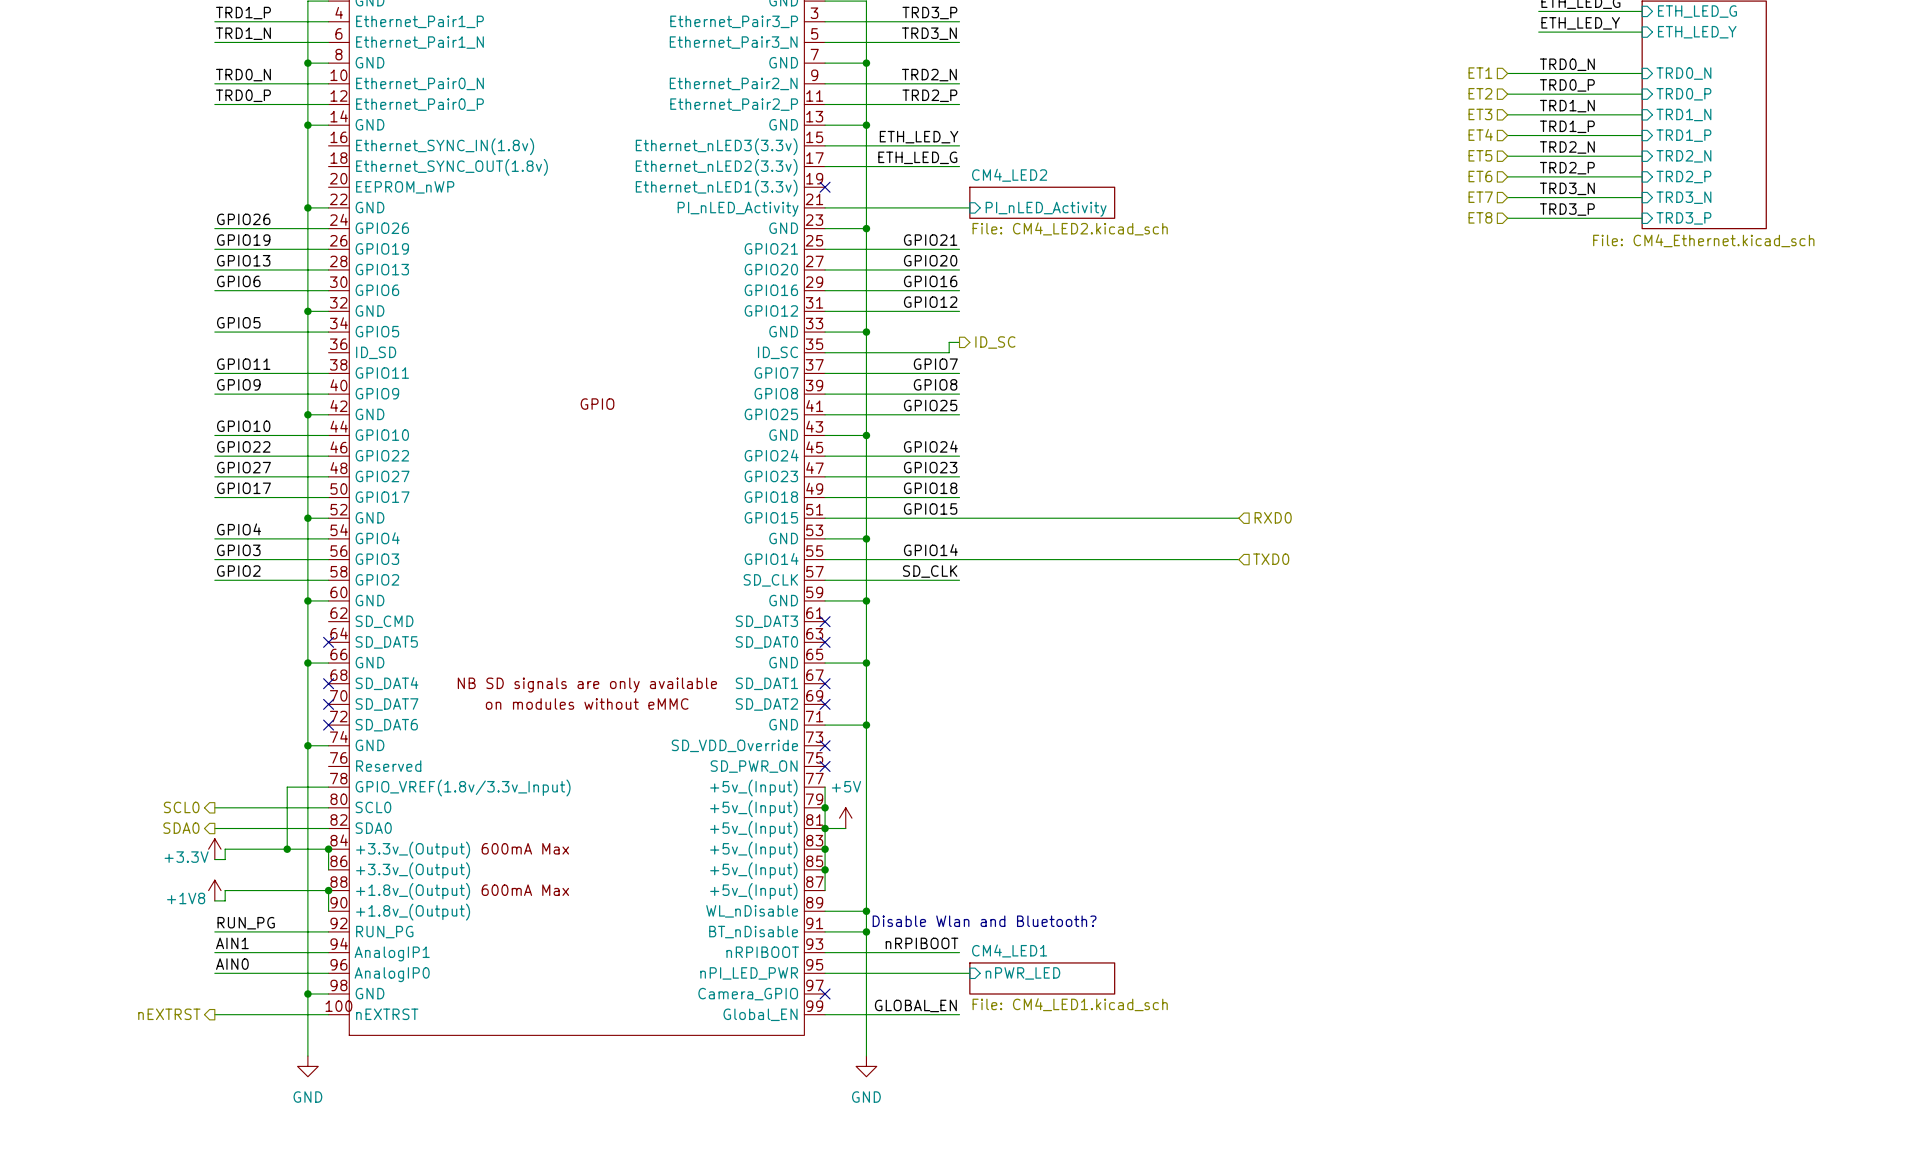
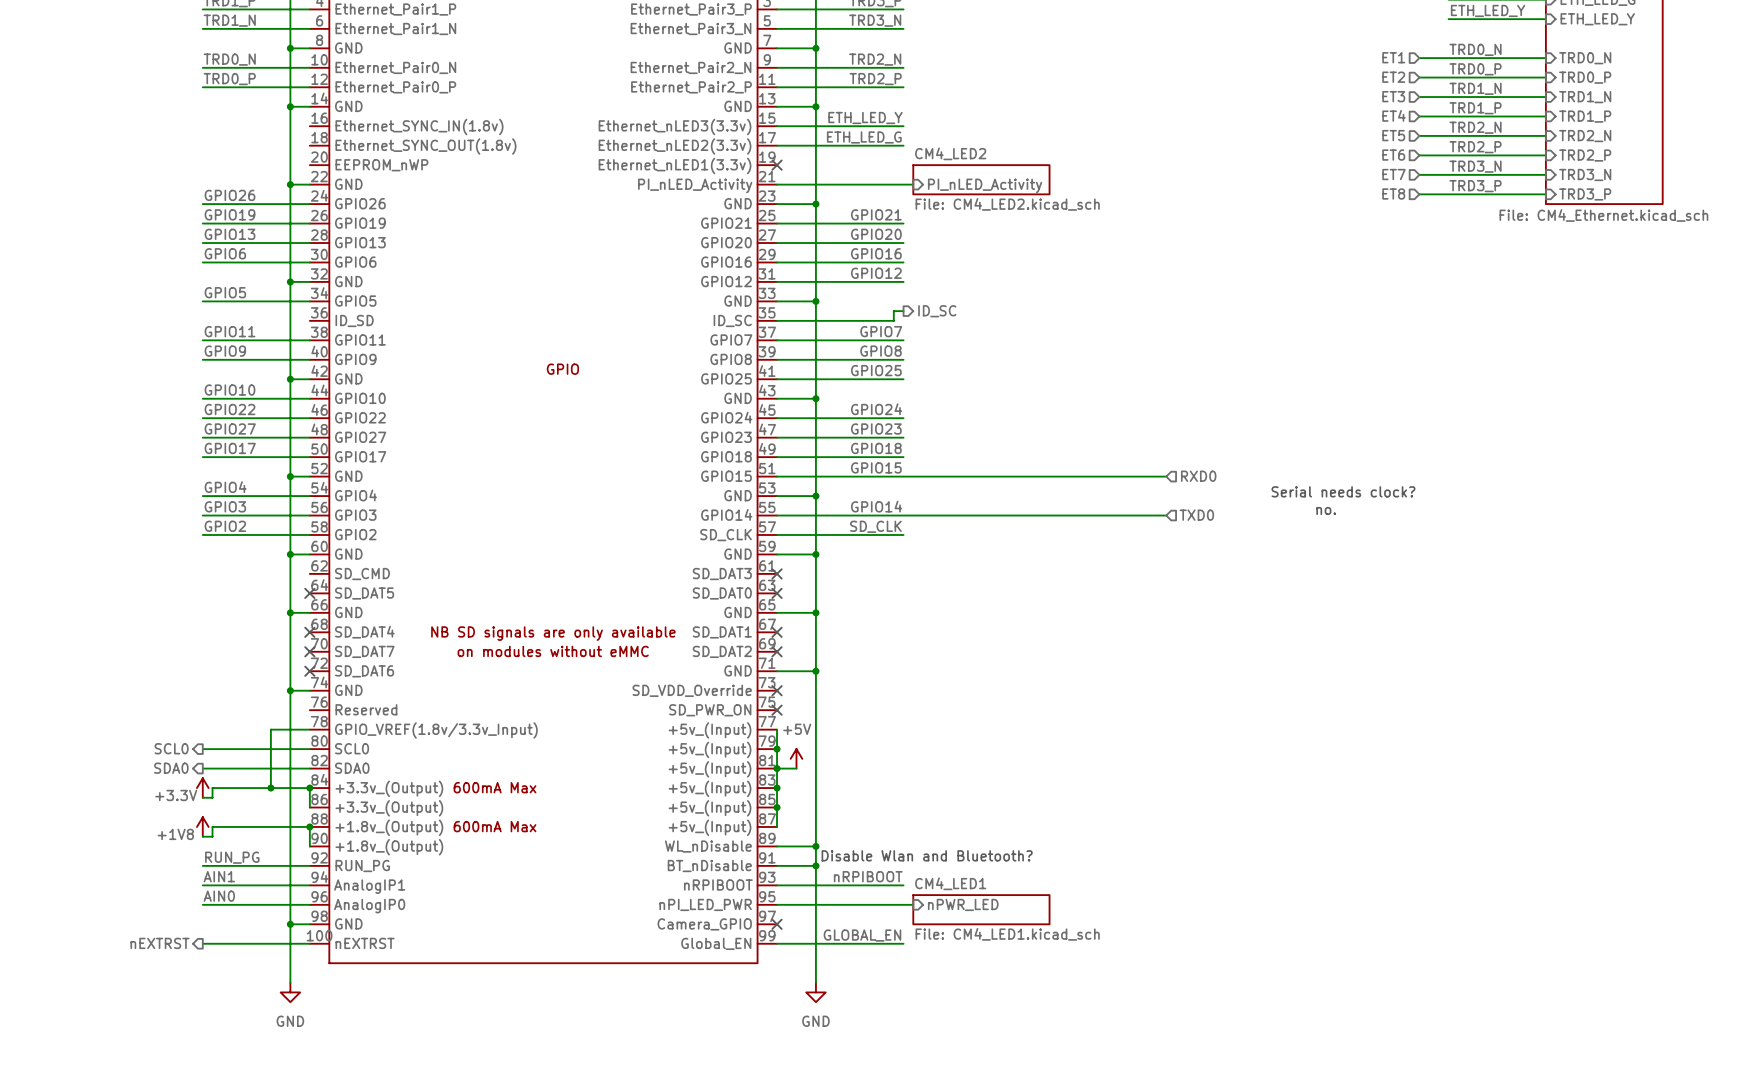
text: none -> Serial needs clock? (1343, 491)
text: none -> no. (1326, 510)

